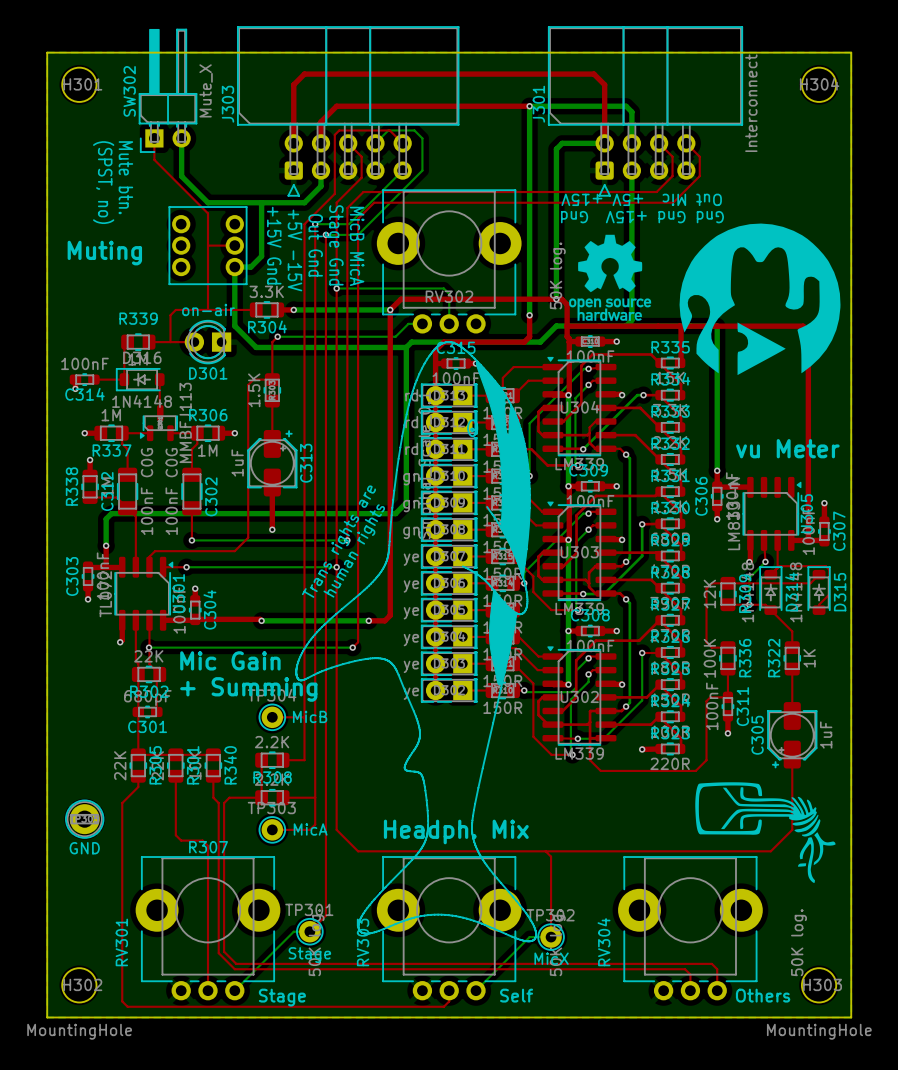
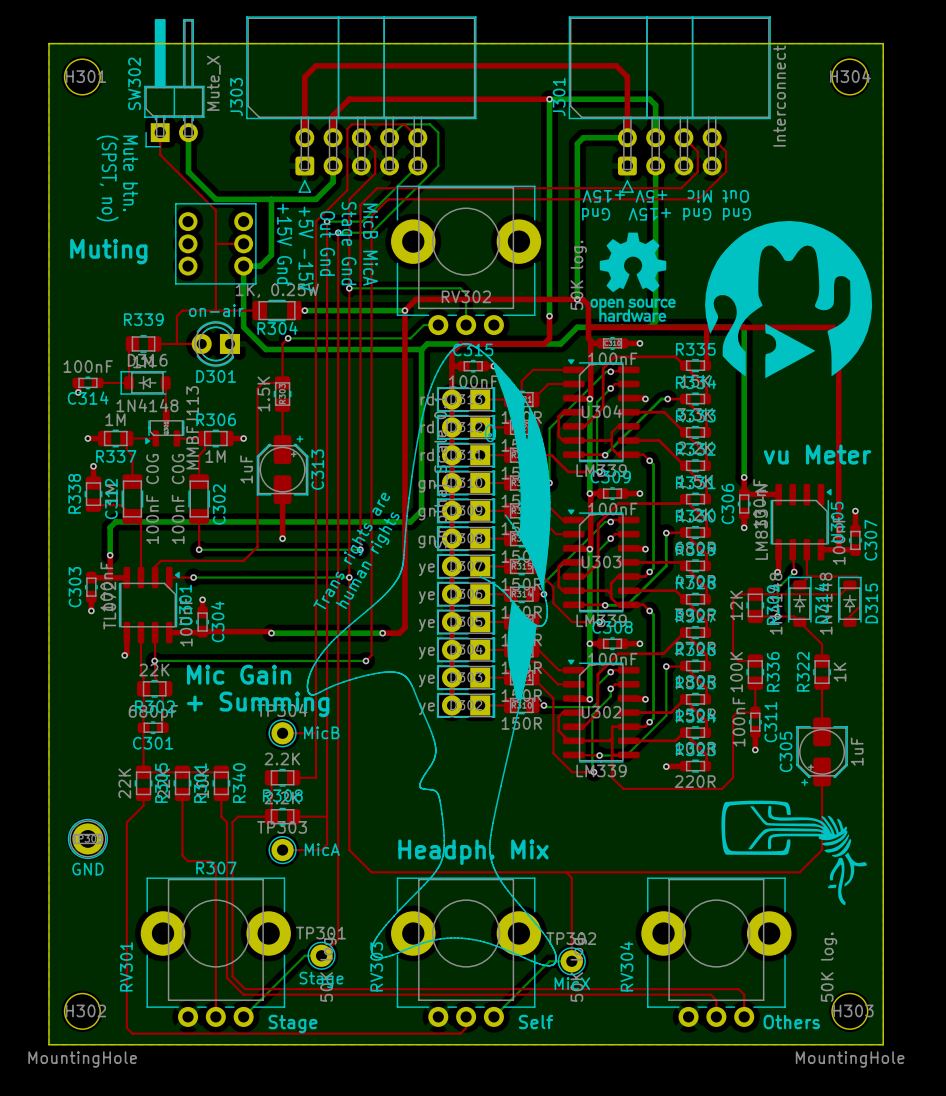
R304 value: 3.3K (266, 291) -> 1K, 0.25W (277, 290)
R304 footprint: [249, 301, 285, 319] -> [252, 299, 302, 322]

